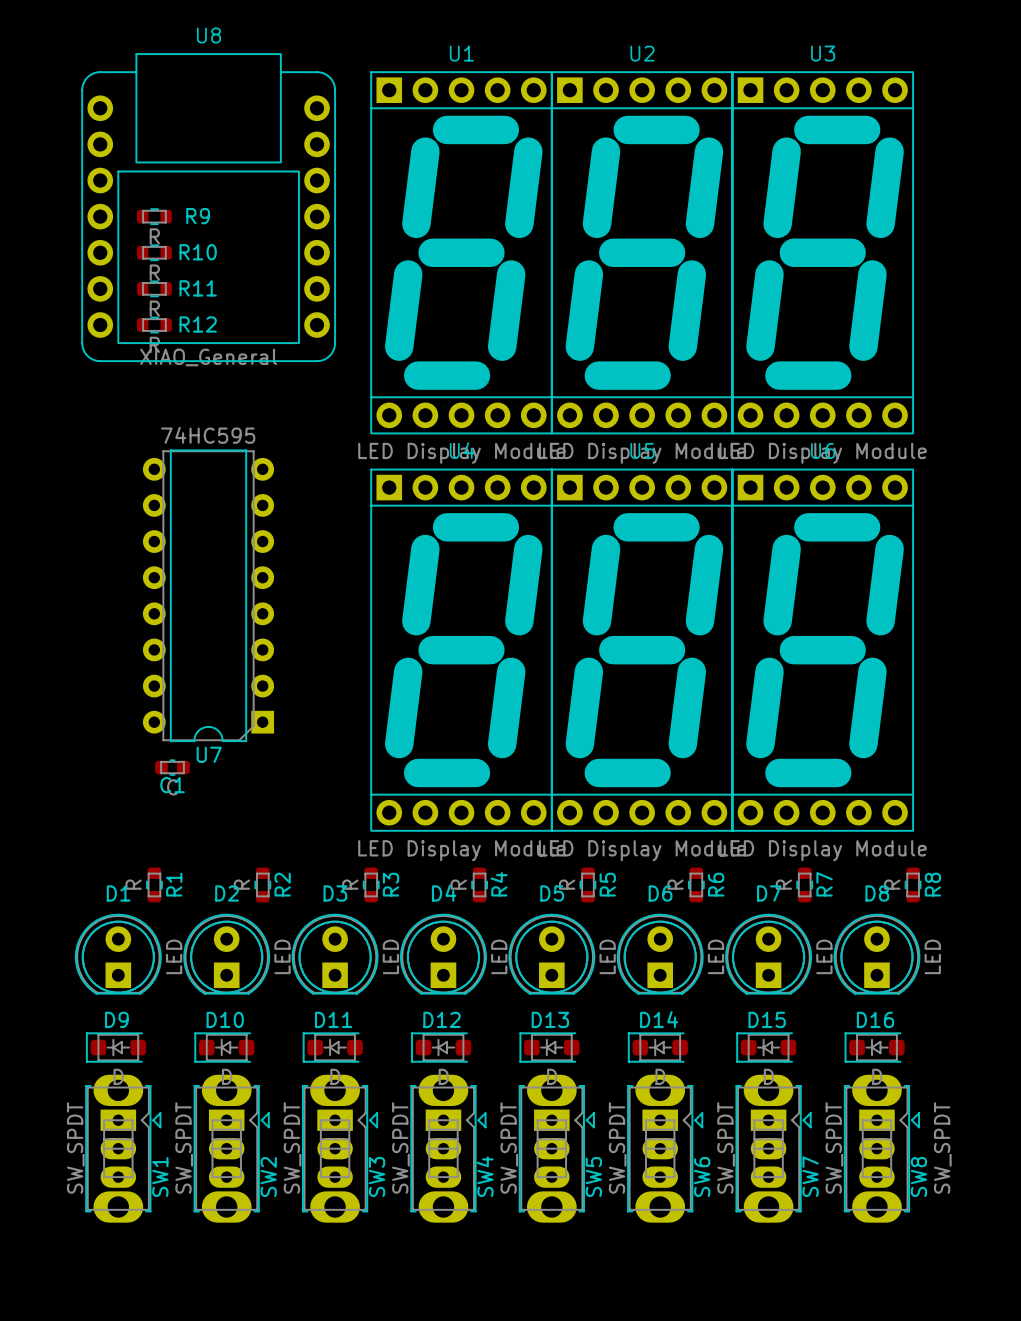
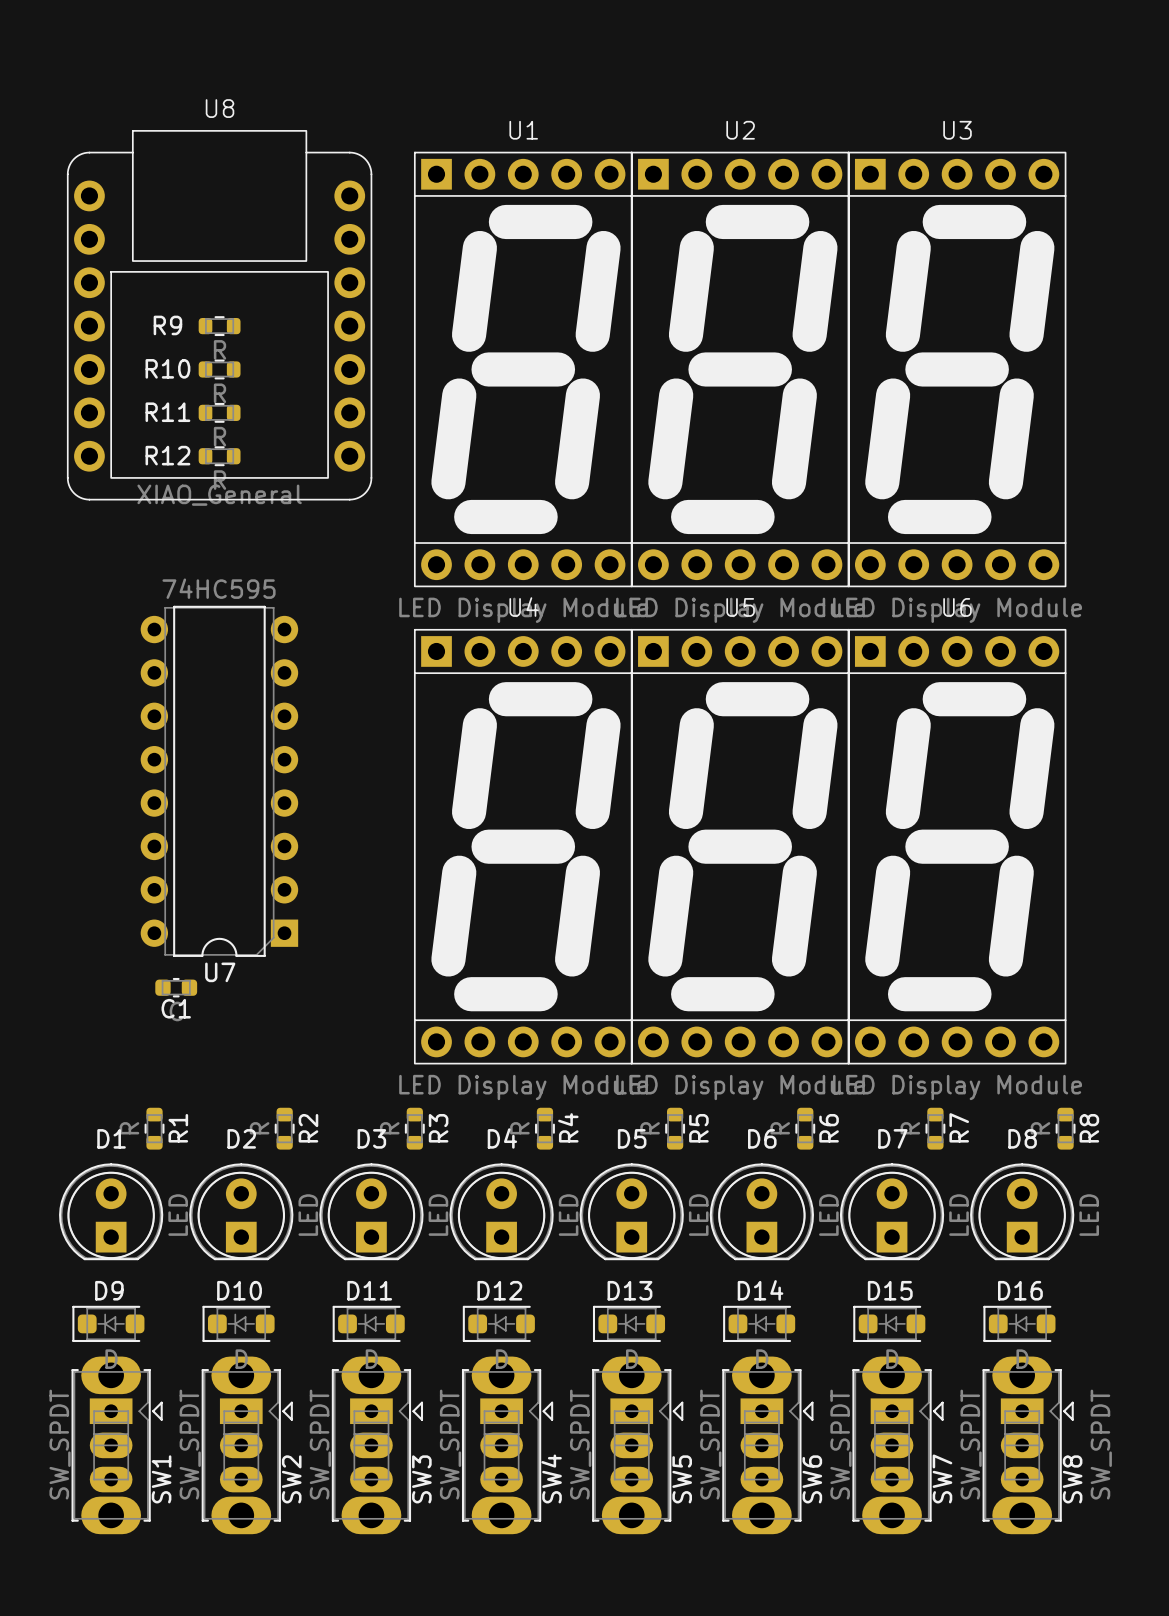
R9 position: (154, 216) -> (219, 326)
R9 name position: R9 (198, 216) -> R9 (167, 325)
R10 position: (154, 252) -> (219, 369)
R10 name position: R10 (198, 252) -> R10 (167, 368)
R11 position: (154, 288) -> (219, 412)
R11 name position: R11 (198, 288) -> R11 (167, 412)
R12 name position: R12 (198, 324) -> R12 (167, 455)
R12 position: (154, 325) -> (219, 456)

